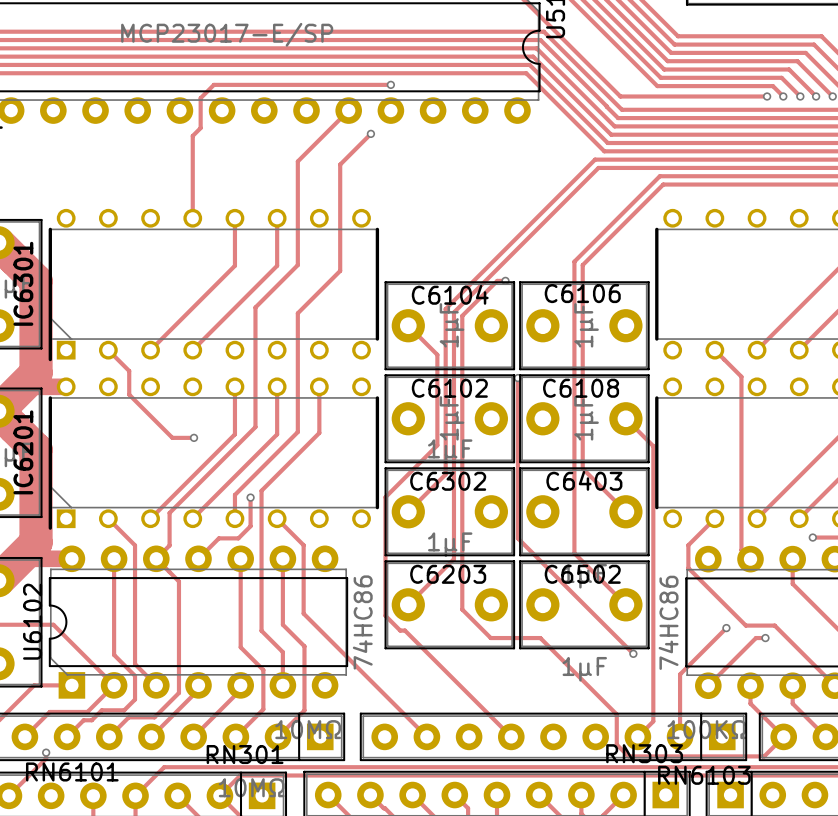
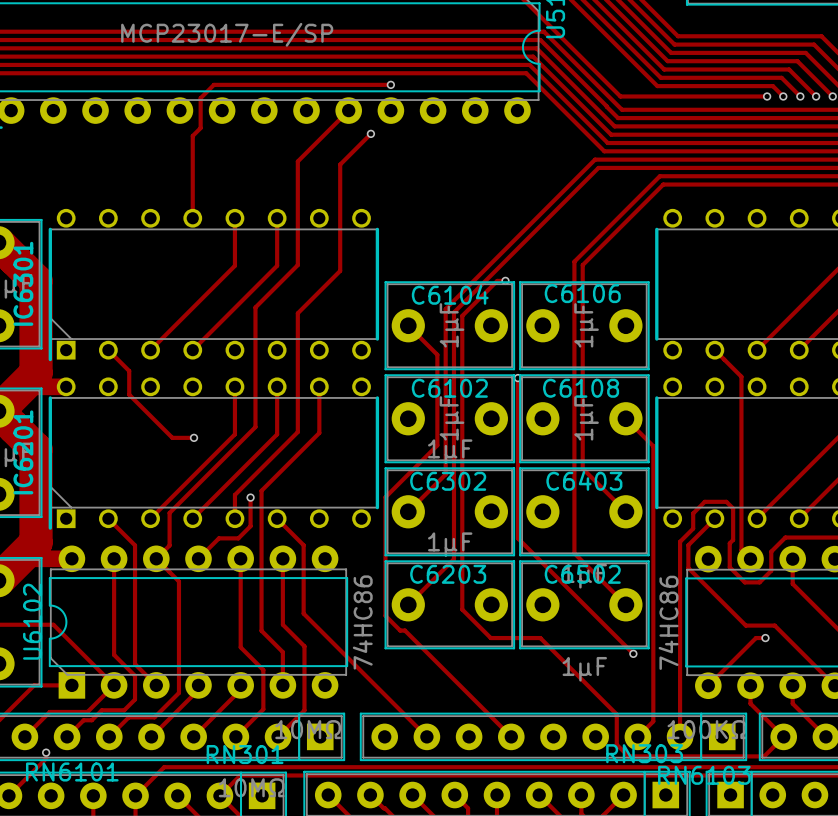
via: (812, 537) -> none
track: (726, 628) (680, 674) -> (812, 537) (785, 537) (771, 551) (771, 570) (759, 582) (744, 582) (729, 567) (729, 543) (733, 539) (733, 508) (726, 501) (704, 501) (693, 513) (693, 528) (680, 541) (680, 674)
via: (726, 628) -> none

